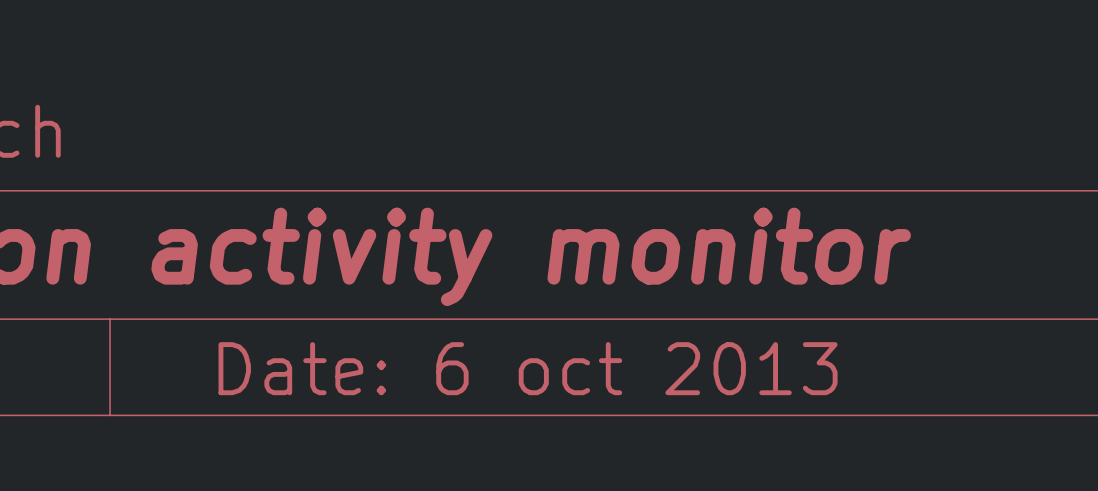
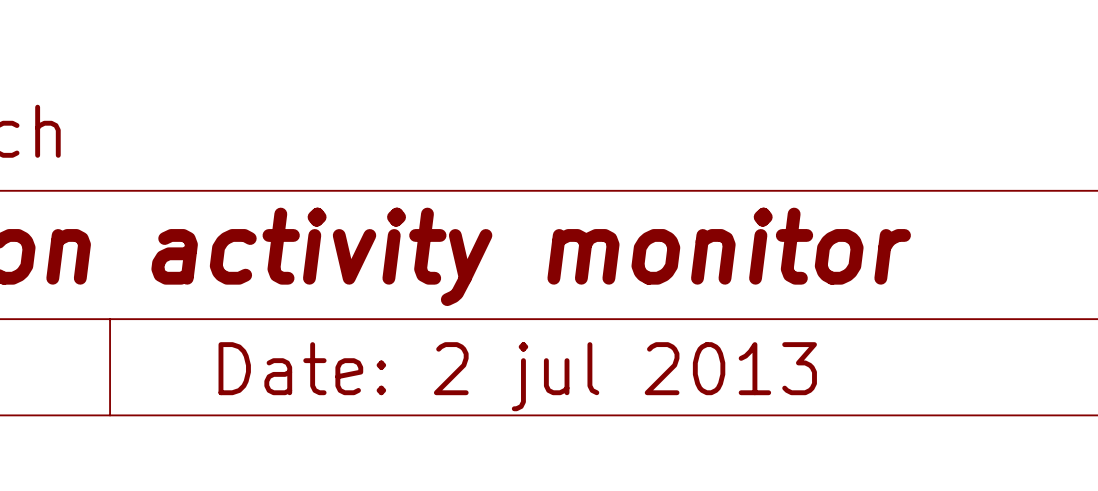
title block: Date: 6 oct 2013 (528, 368) -> Date: 2 jul 2013 (517, 376)

